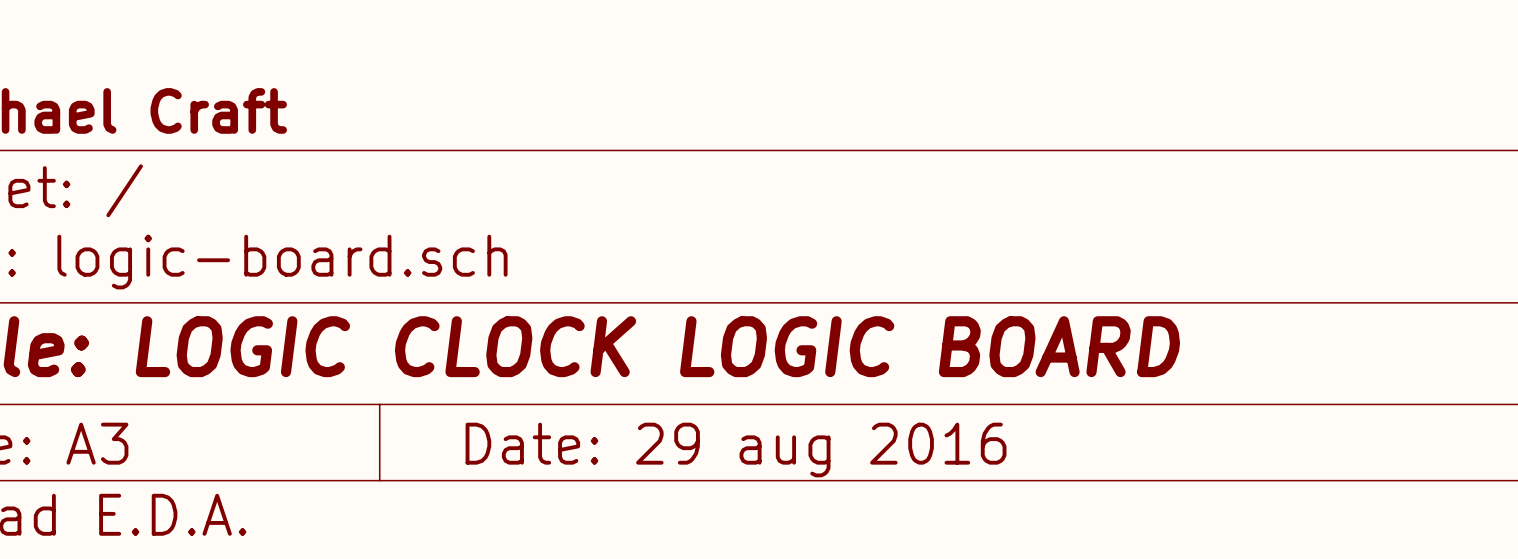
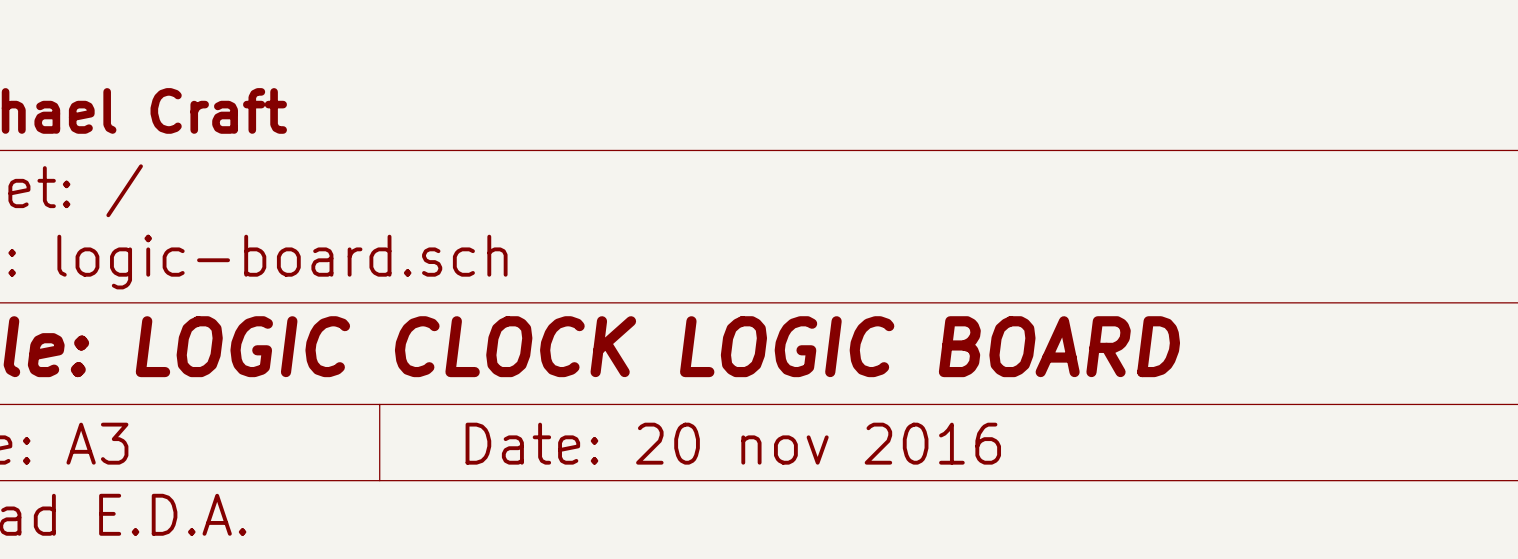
title block: Date: 29 aug 2016 (736, 450) -> Date: 20 nov 2016 (733, 443)

